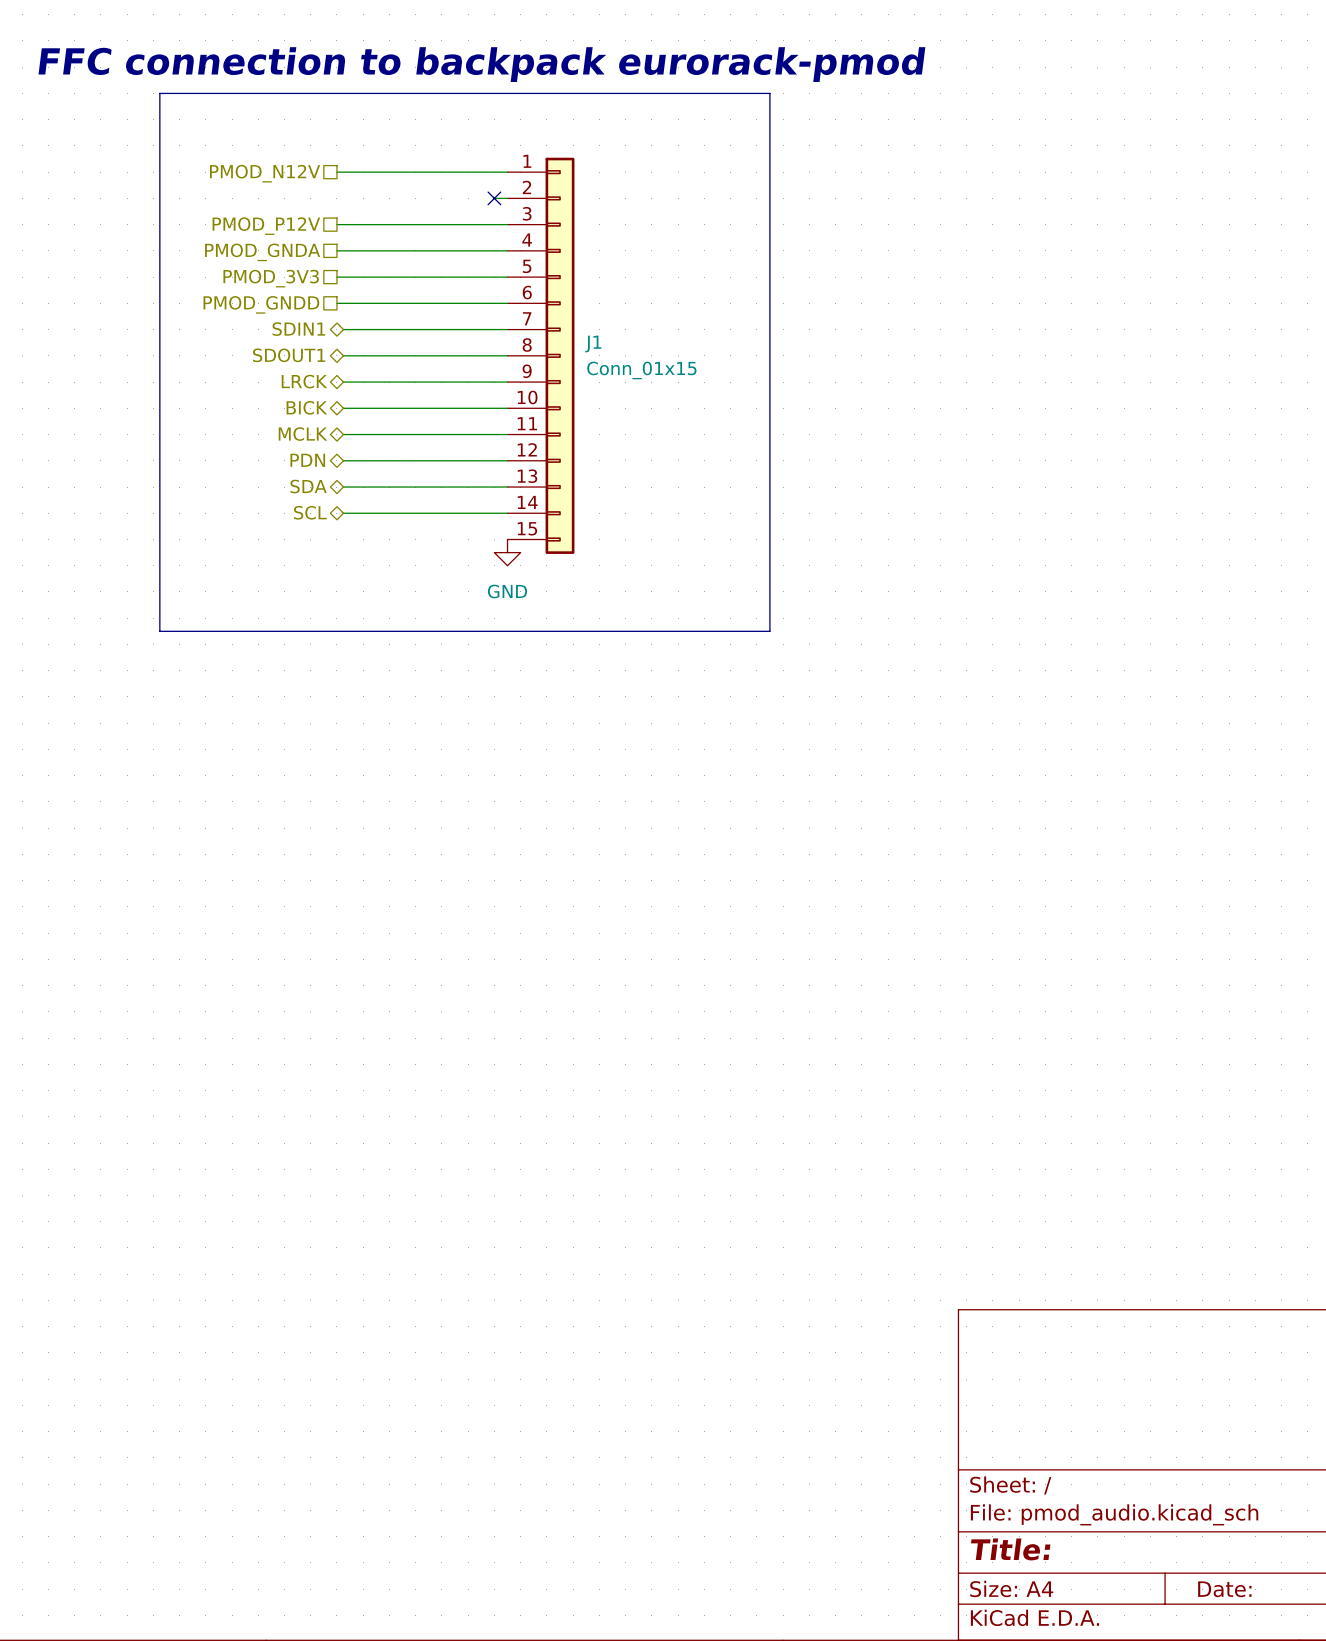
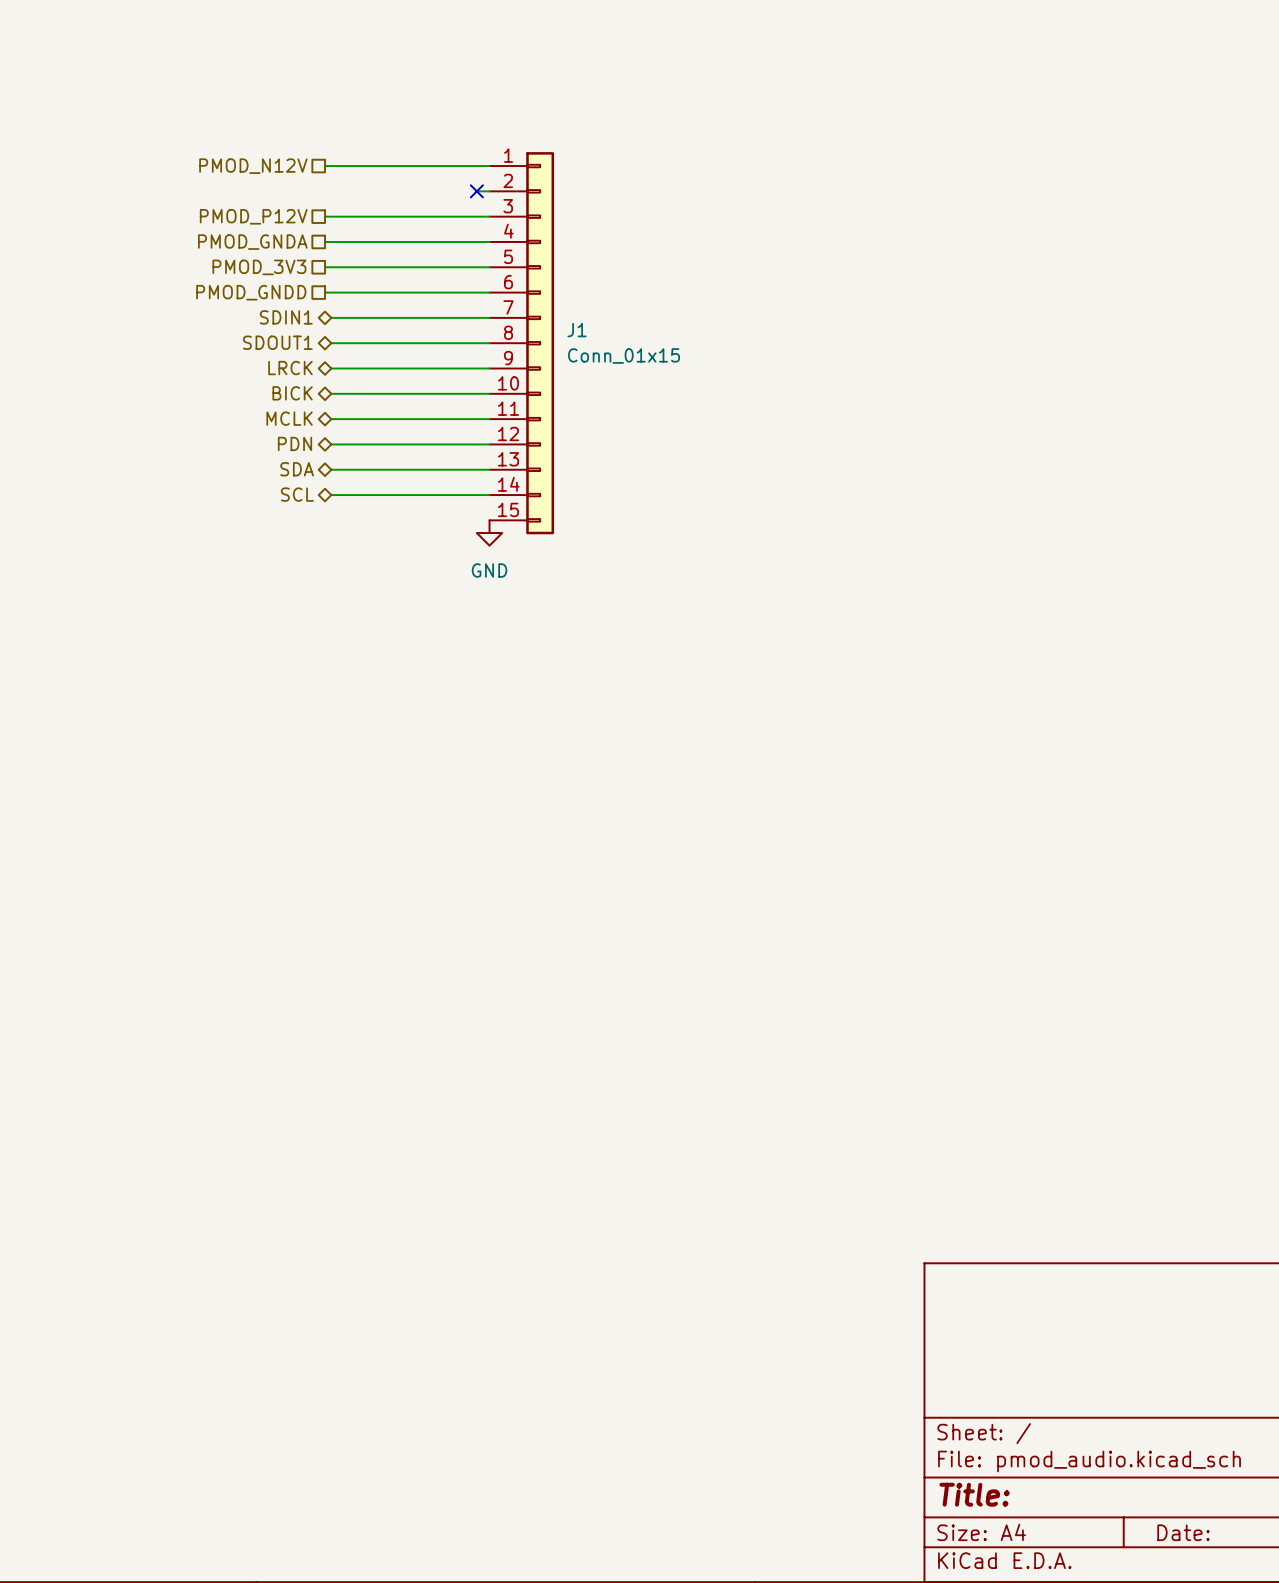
text: FFC connection to backpack eurorack-pmod (481, 64) -> none
line: (159, 93) (769, 93) (769, 631) (159, 631) (159, 93) -> none

